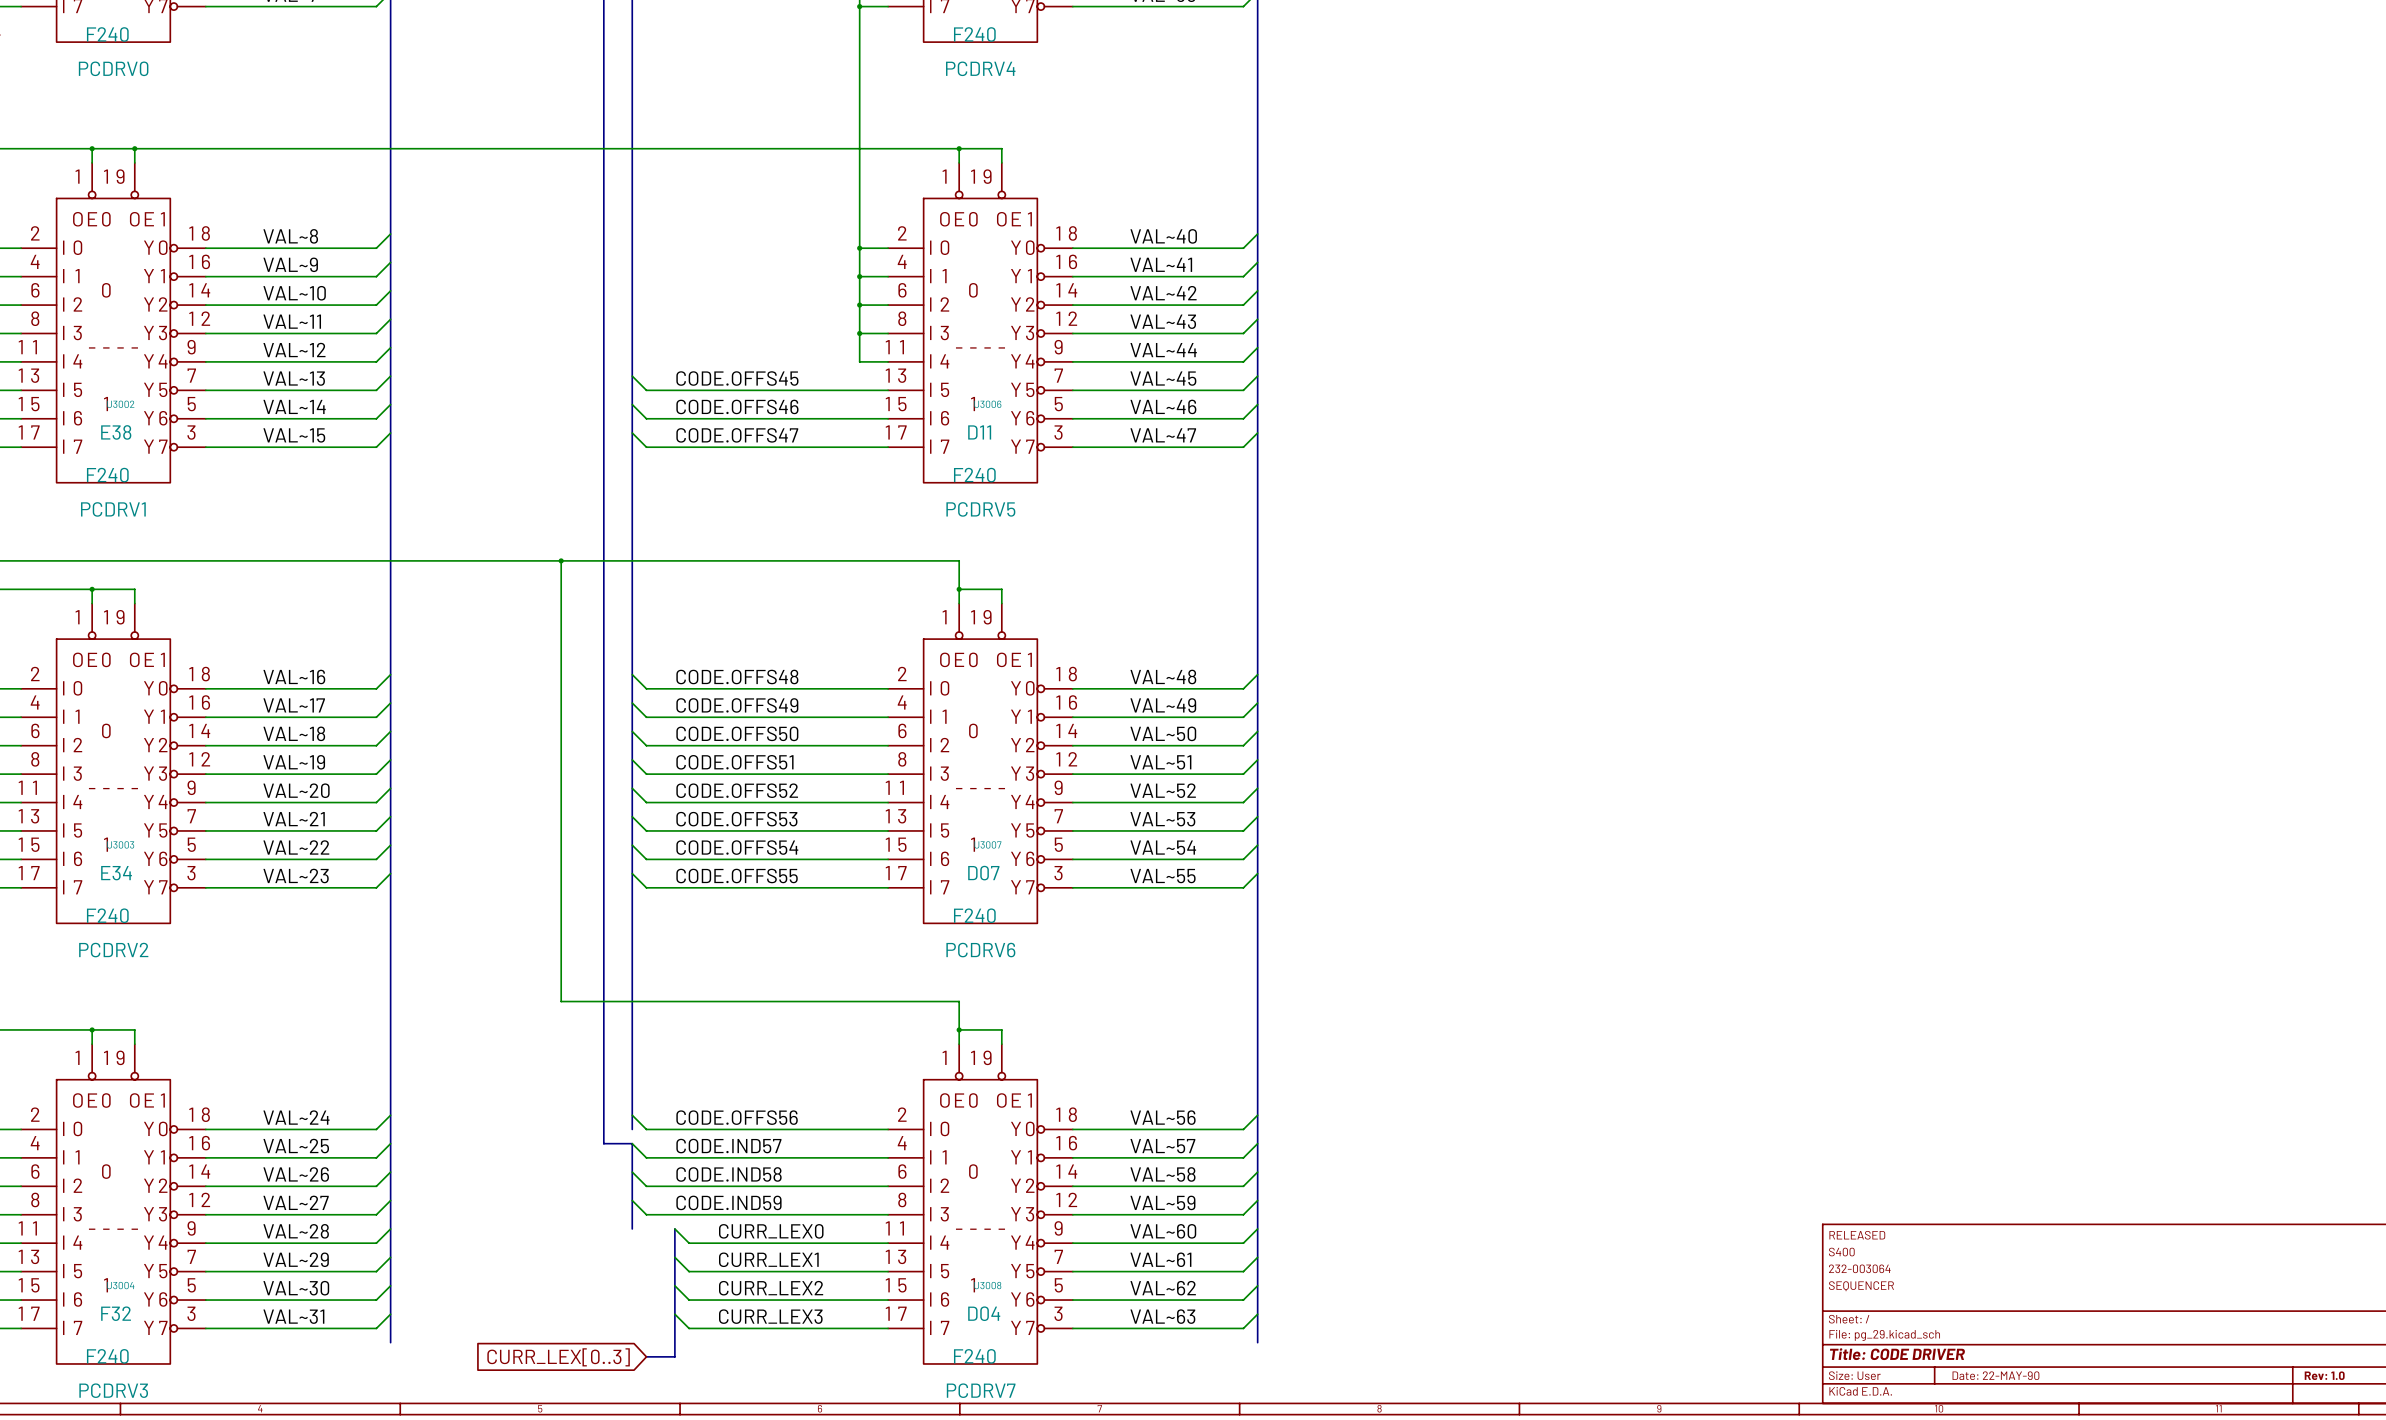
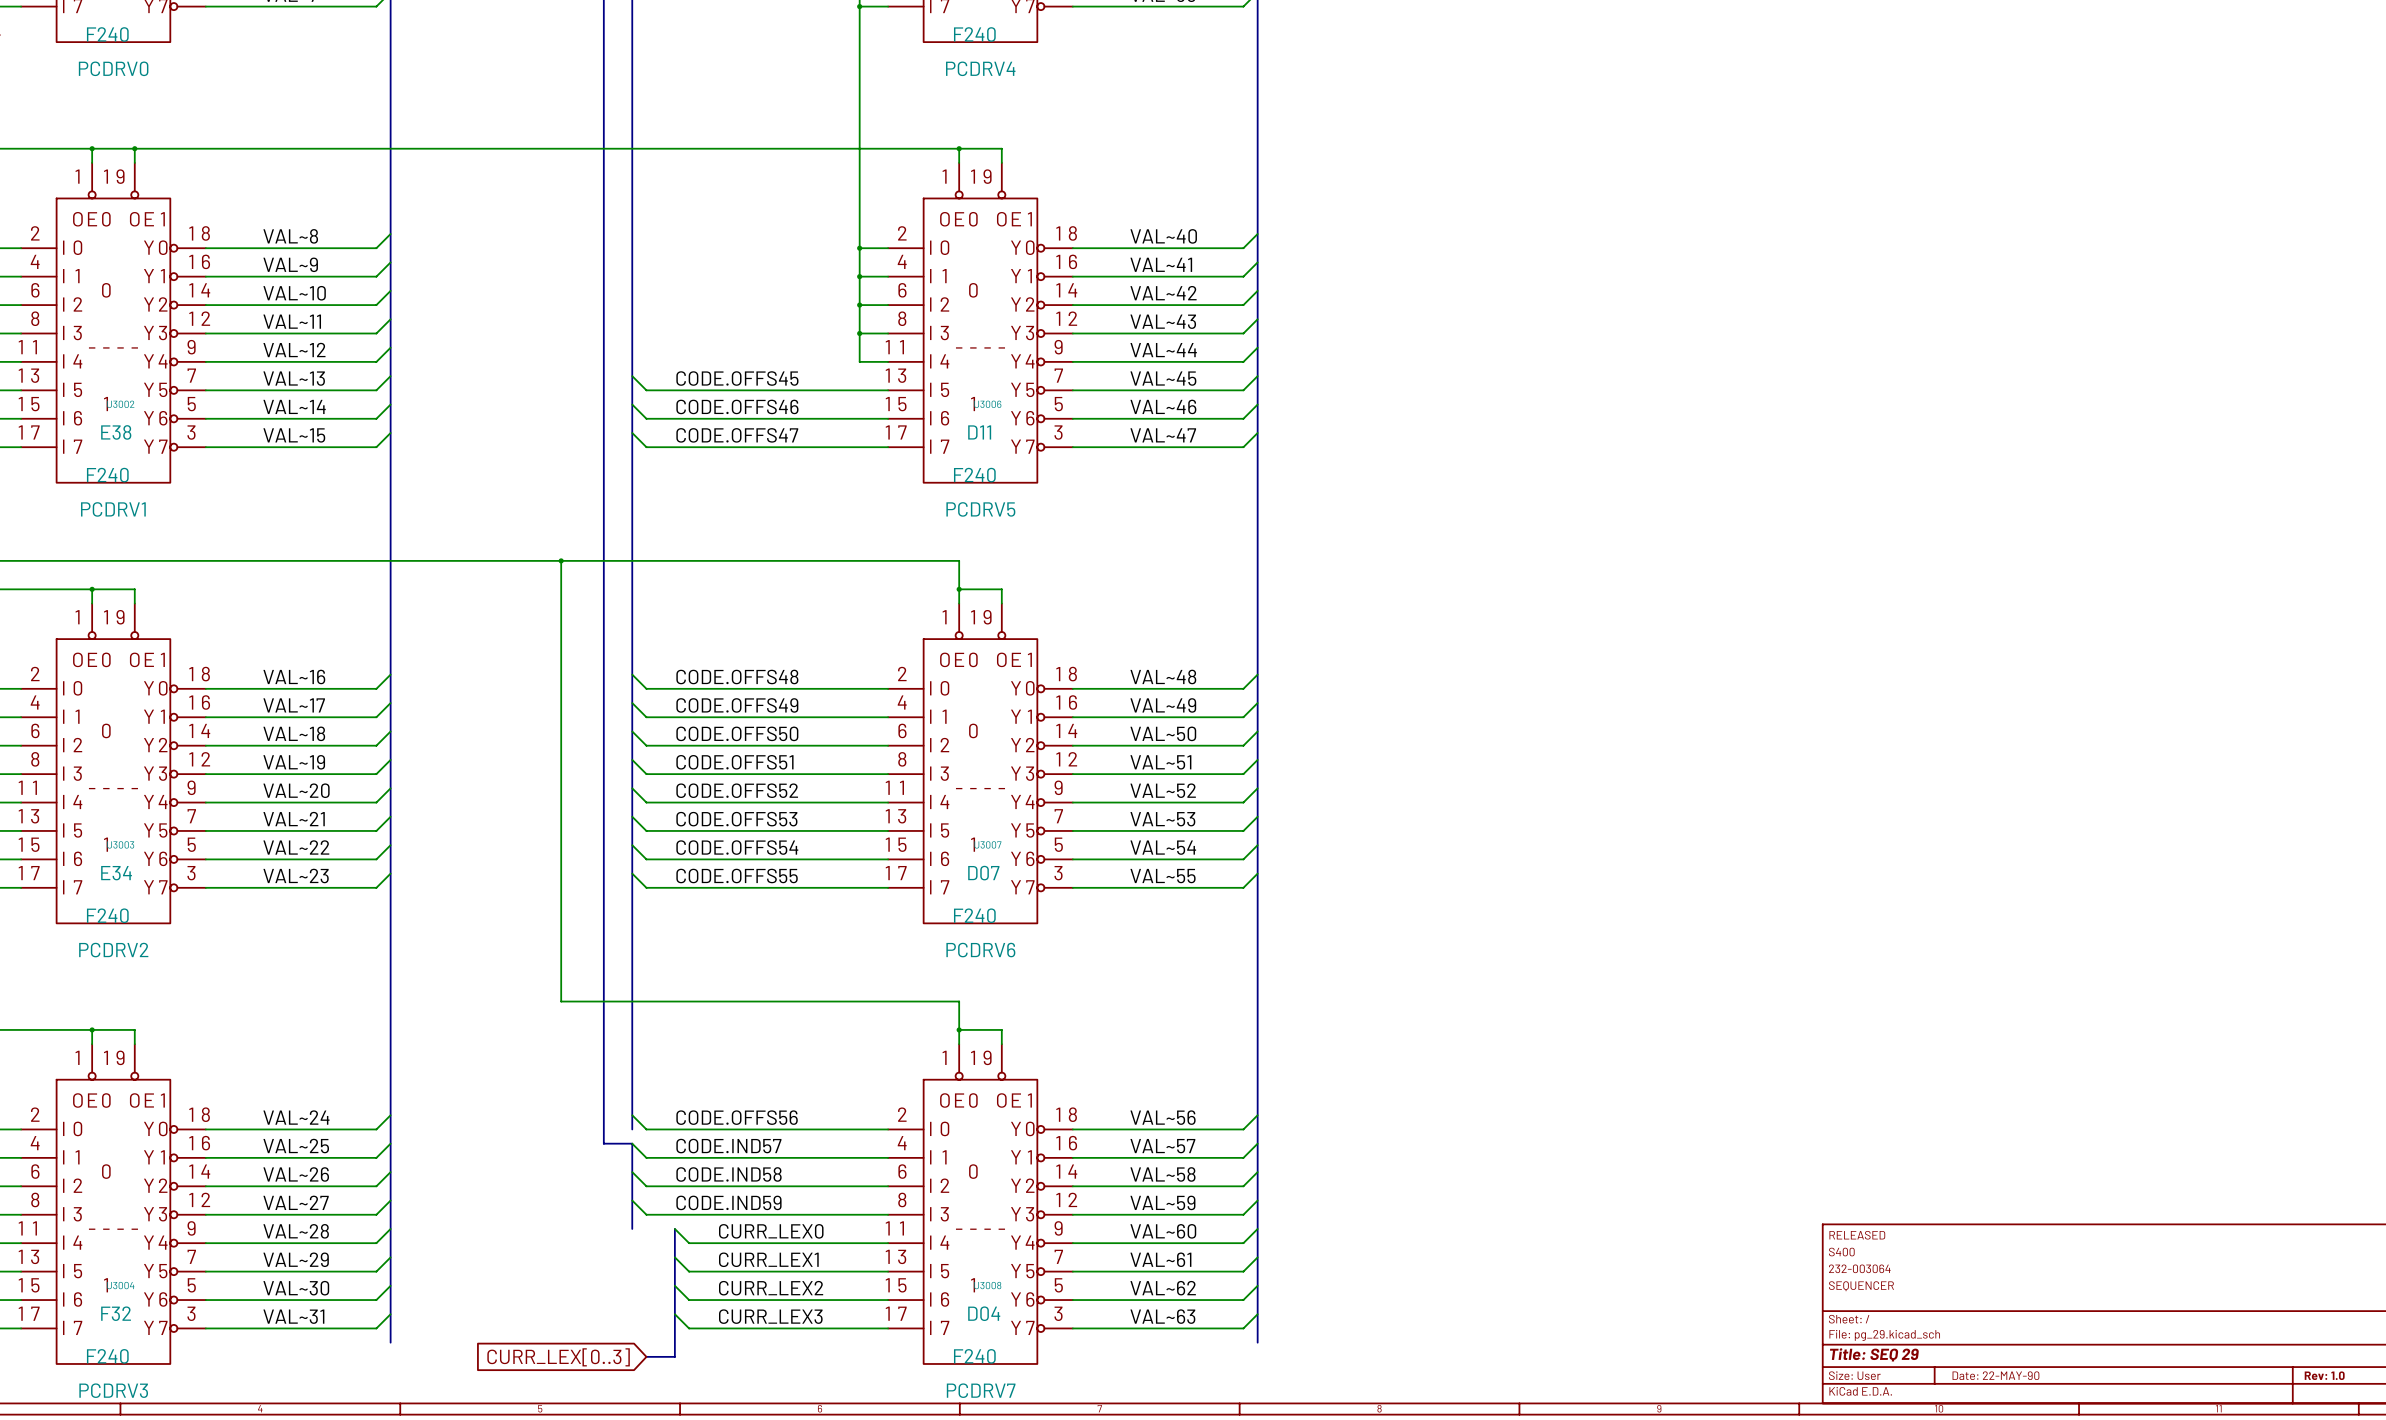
title block: Title: CODE DRIVER (1897, 1354) -> Title: SEQ 29 (1874, 1354)

